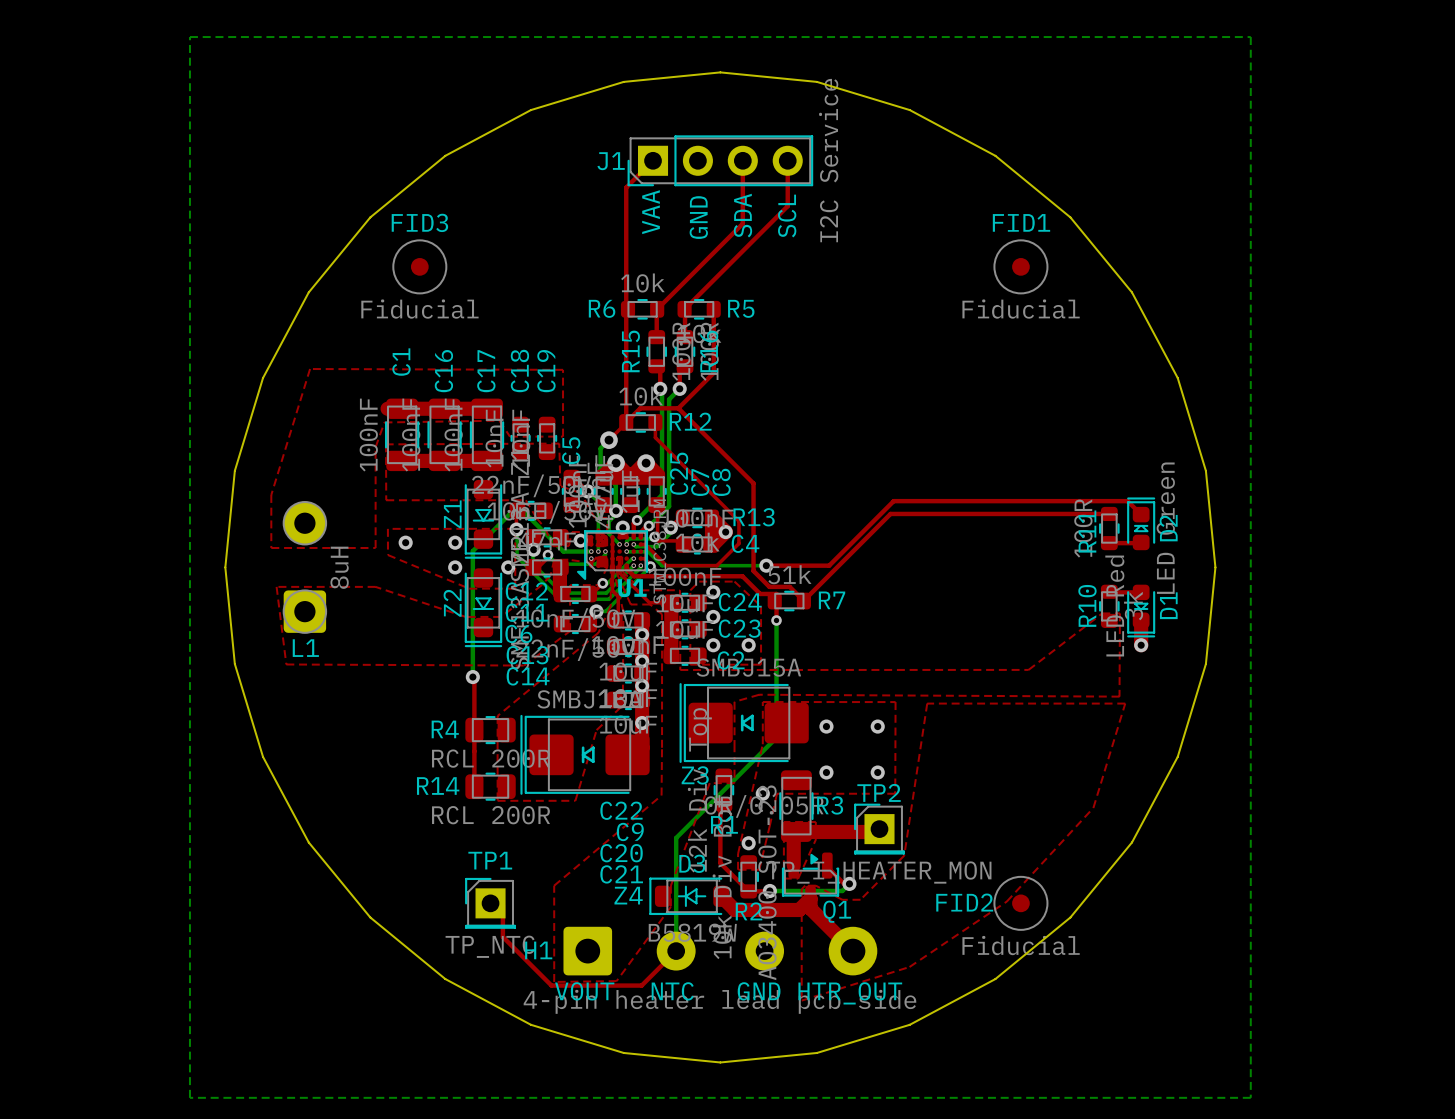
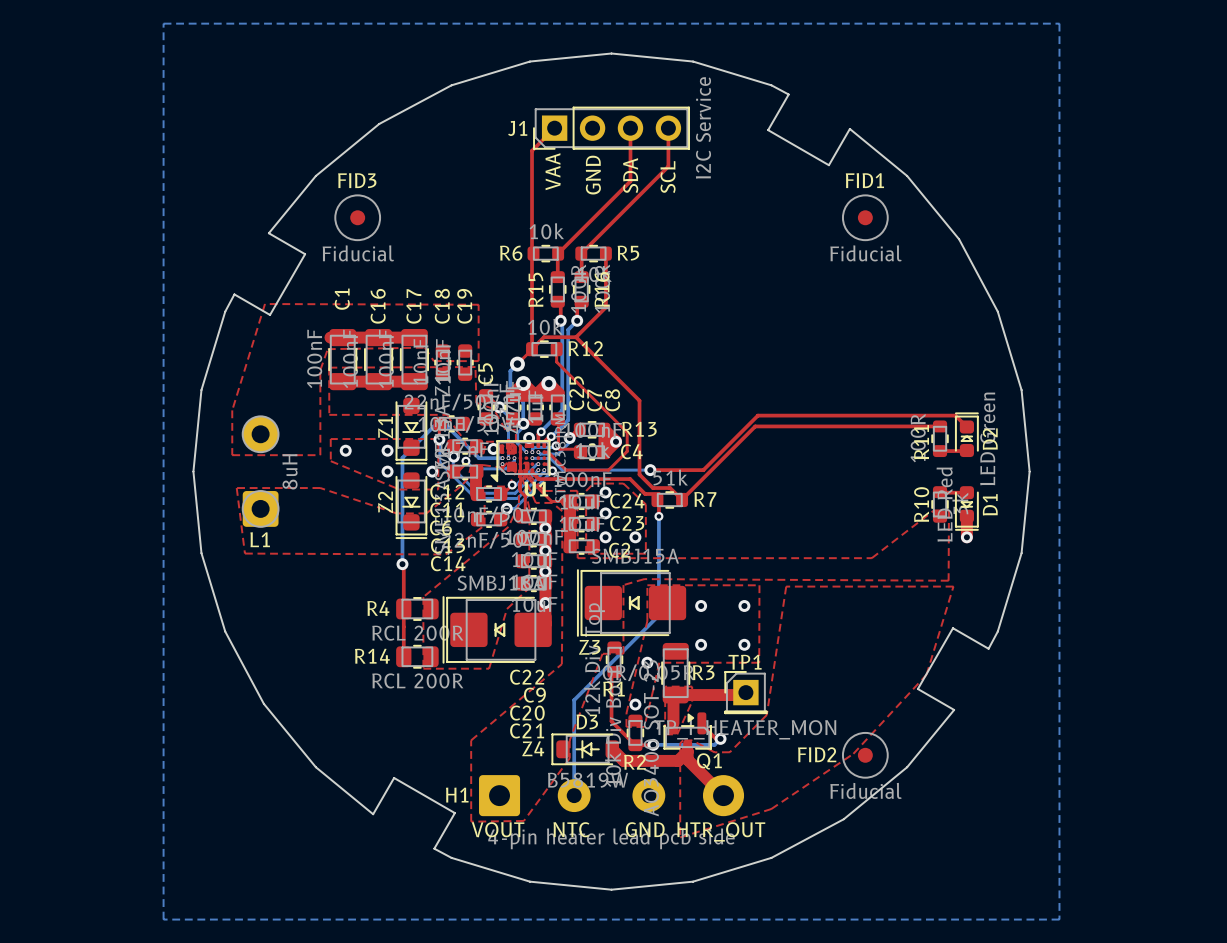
board edge: (909, 110) (995, 155) (1070, 217) -> (771, 85) (788, 94) (768, 130) (828, 165) (849, 128) (907, 175)
board edge: (370, 217) (308, 292) (263, 377) -> (315, 175) (268, 233) (305, 254) (270, 314) (234, 294) (225, 311)
board edge: (1177, 756) (1131, 842) (1070, 917) -> (997, 631) (988, 648) (953, 628) (917, 689) (954, 709) (907, 767)
TP2 name: TP2 (879, 792) -> TP1 (745, 662)
TP1: TP_NTC (490, 903) -> none
top track: (502, 905) (502, 936) (551, 985) (641, 985) (676, 951) -> none
board edge: (370, 917) (445, 979) (530, 1024) -> (315, 767) (373, 814) (394, 777) (454, 813) (434, 848) (451, 857)

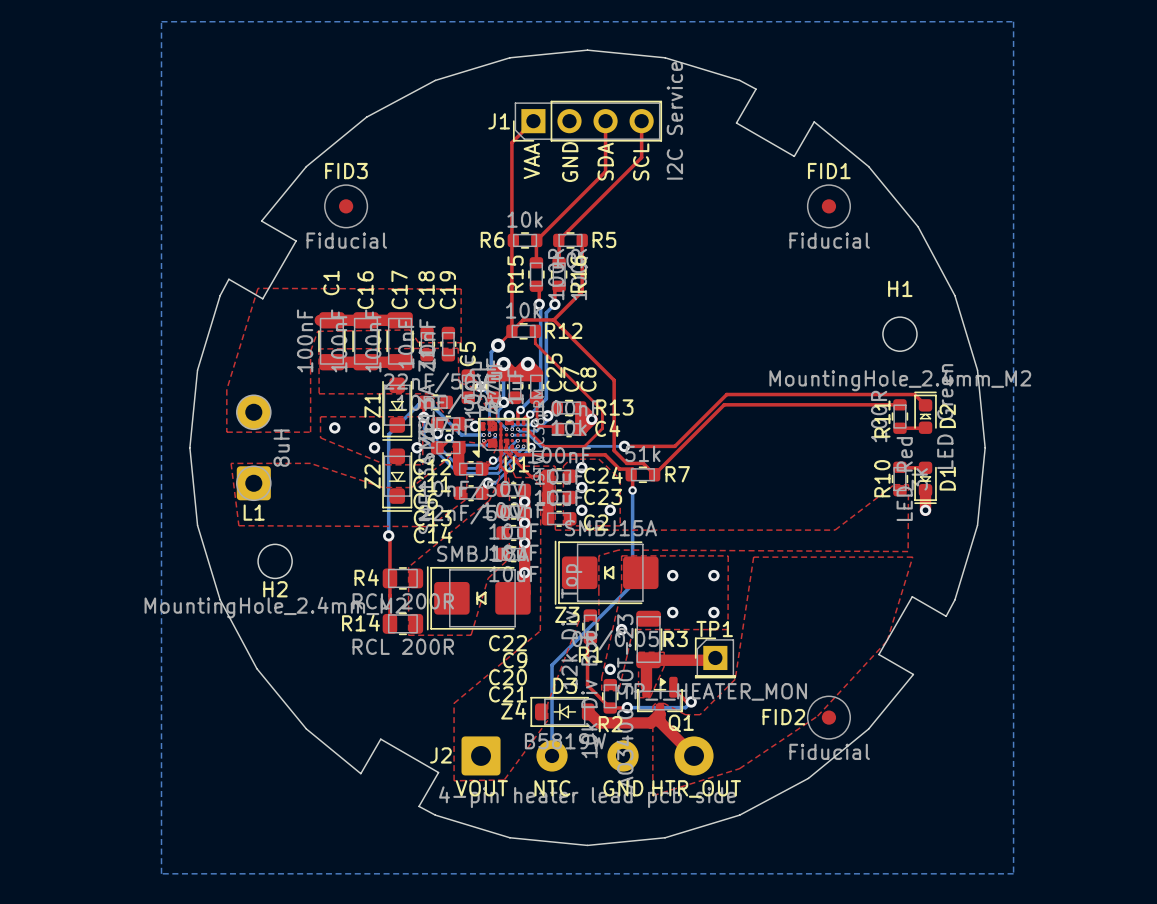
H1: none -> MountingHole_2.4mm_M2 (899, 334)
H2: none -> MountingHole_2.4mm_M2 (275, 561)
H1 name: H1 (457, 795) -> J2 (440, 755)

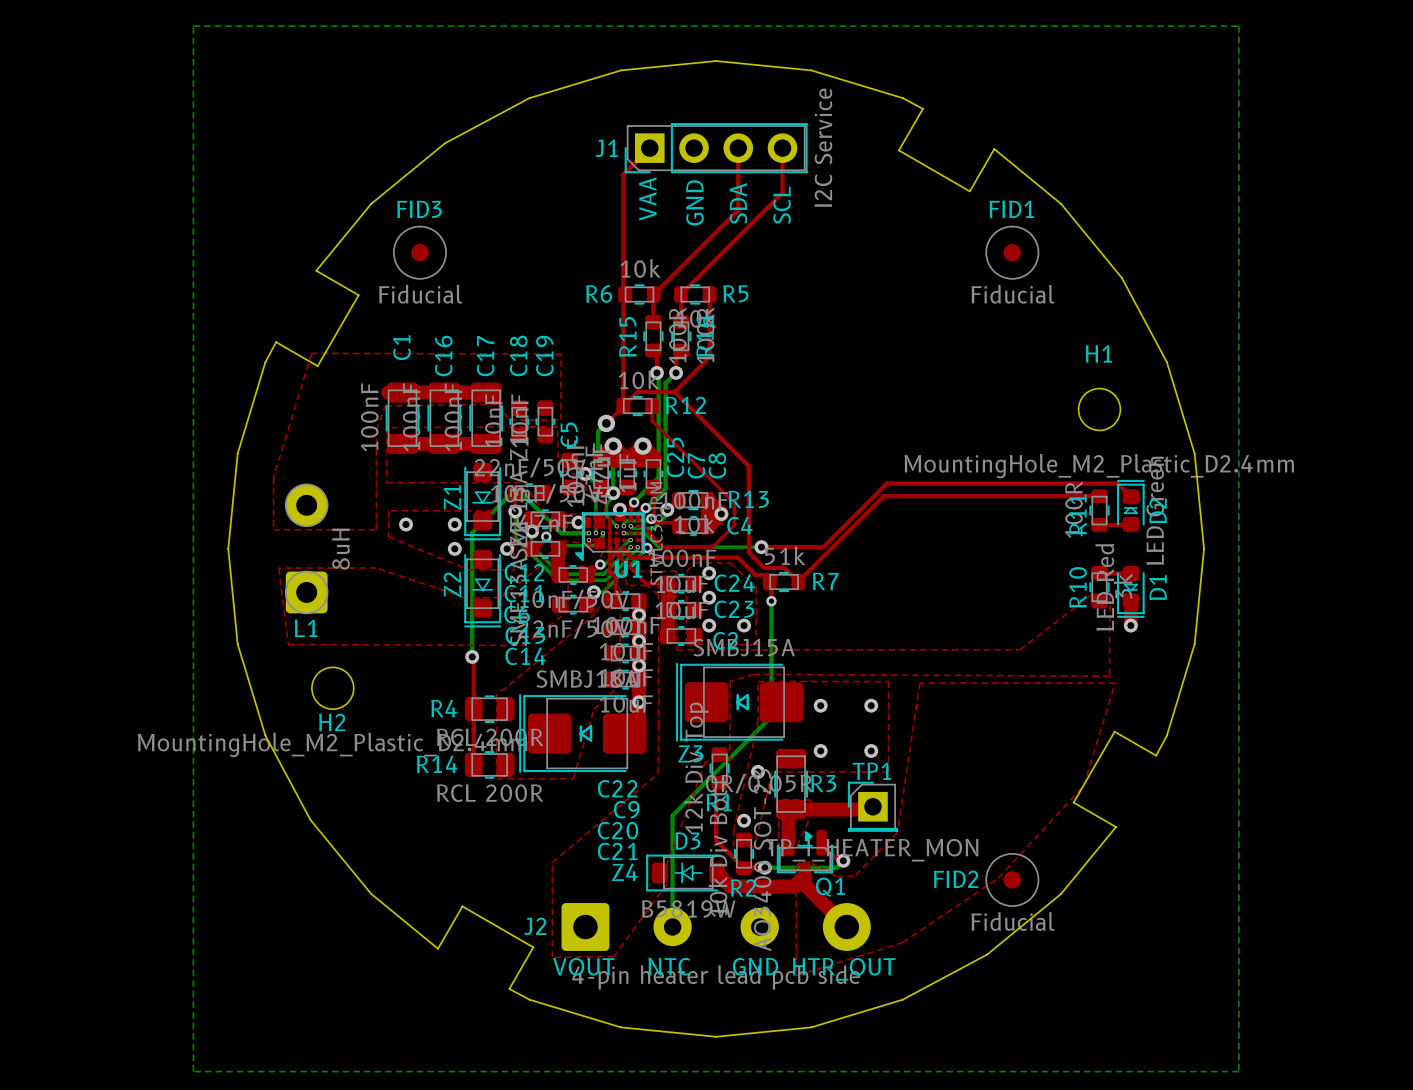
H1 value: MountingHole_2.4mm_M2 (900, 380) -> MountingHole_M2_Plastic_D2.4mm (1099, 466)
H2 value: MountingHole_2.4mm_M2 (275, 607) -> MountingHole_M2_Plastic_D2.4mm (332, 744)

